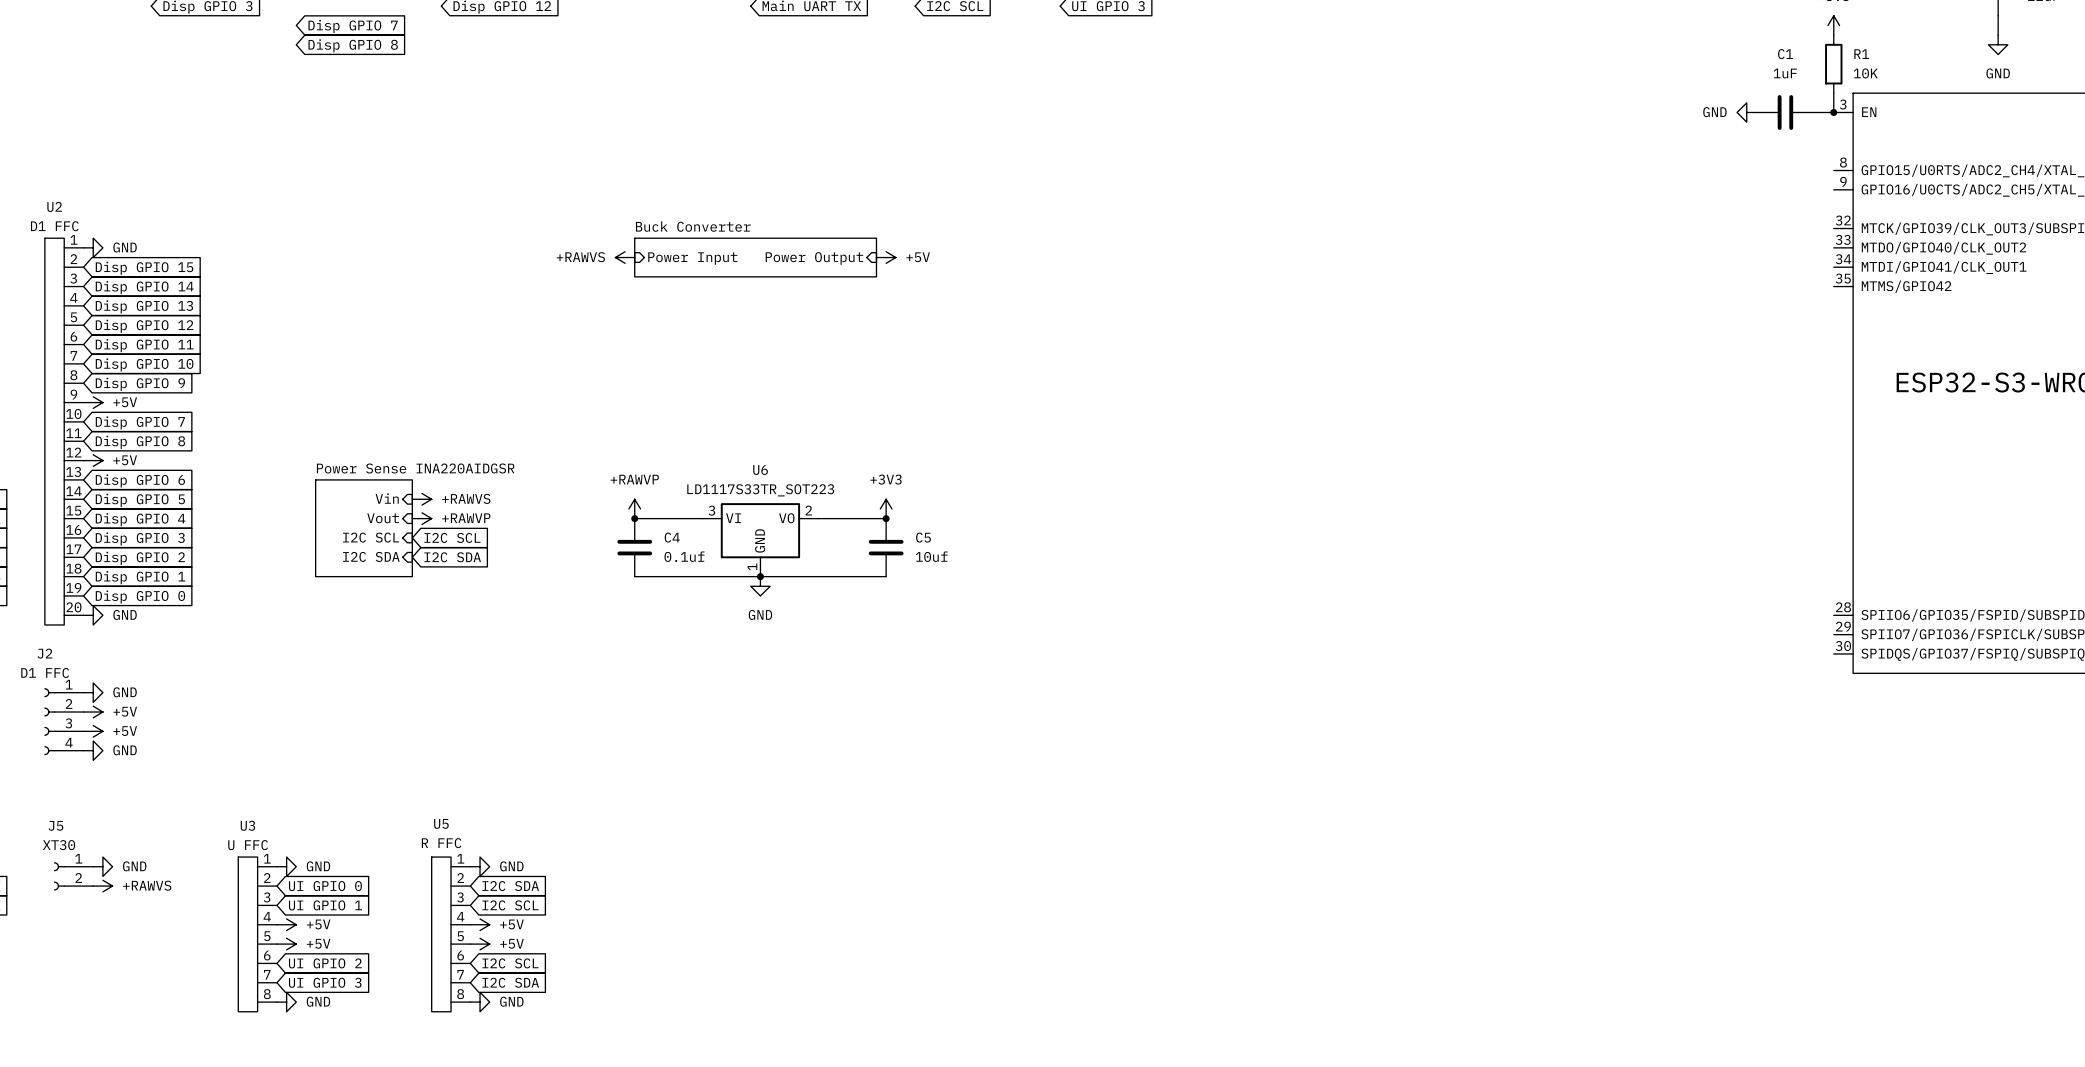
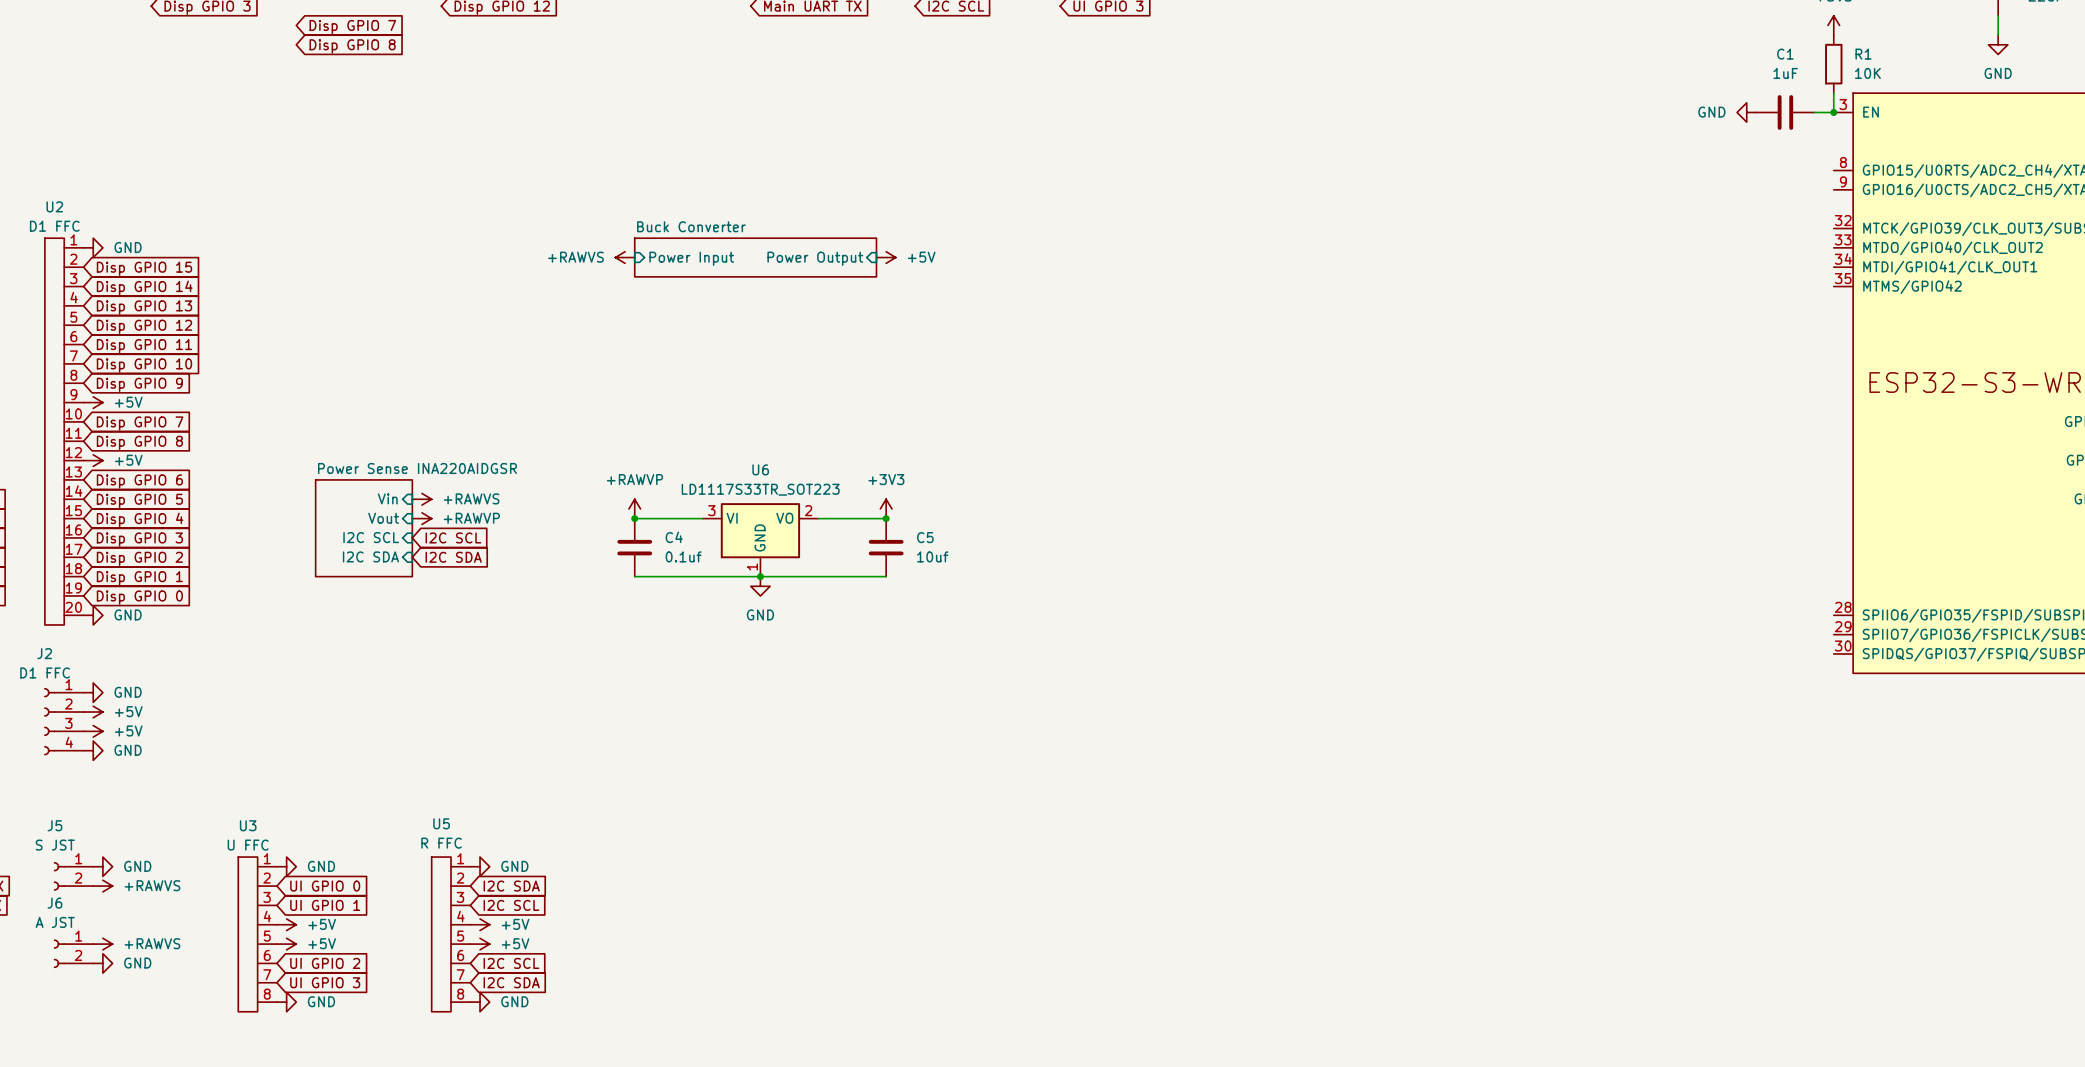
J5 value: XT30 (59, 845) -> S JST (55, 845)
power symbol: none -> +RAWVS (102, 944)
J6: none -> A JST (73, 953)
power symbol: none -> GND (102, 963)

